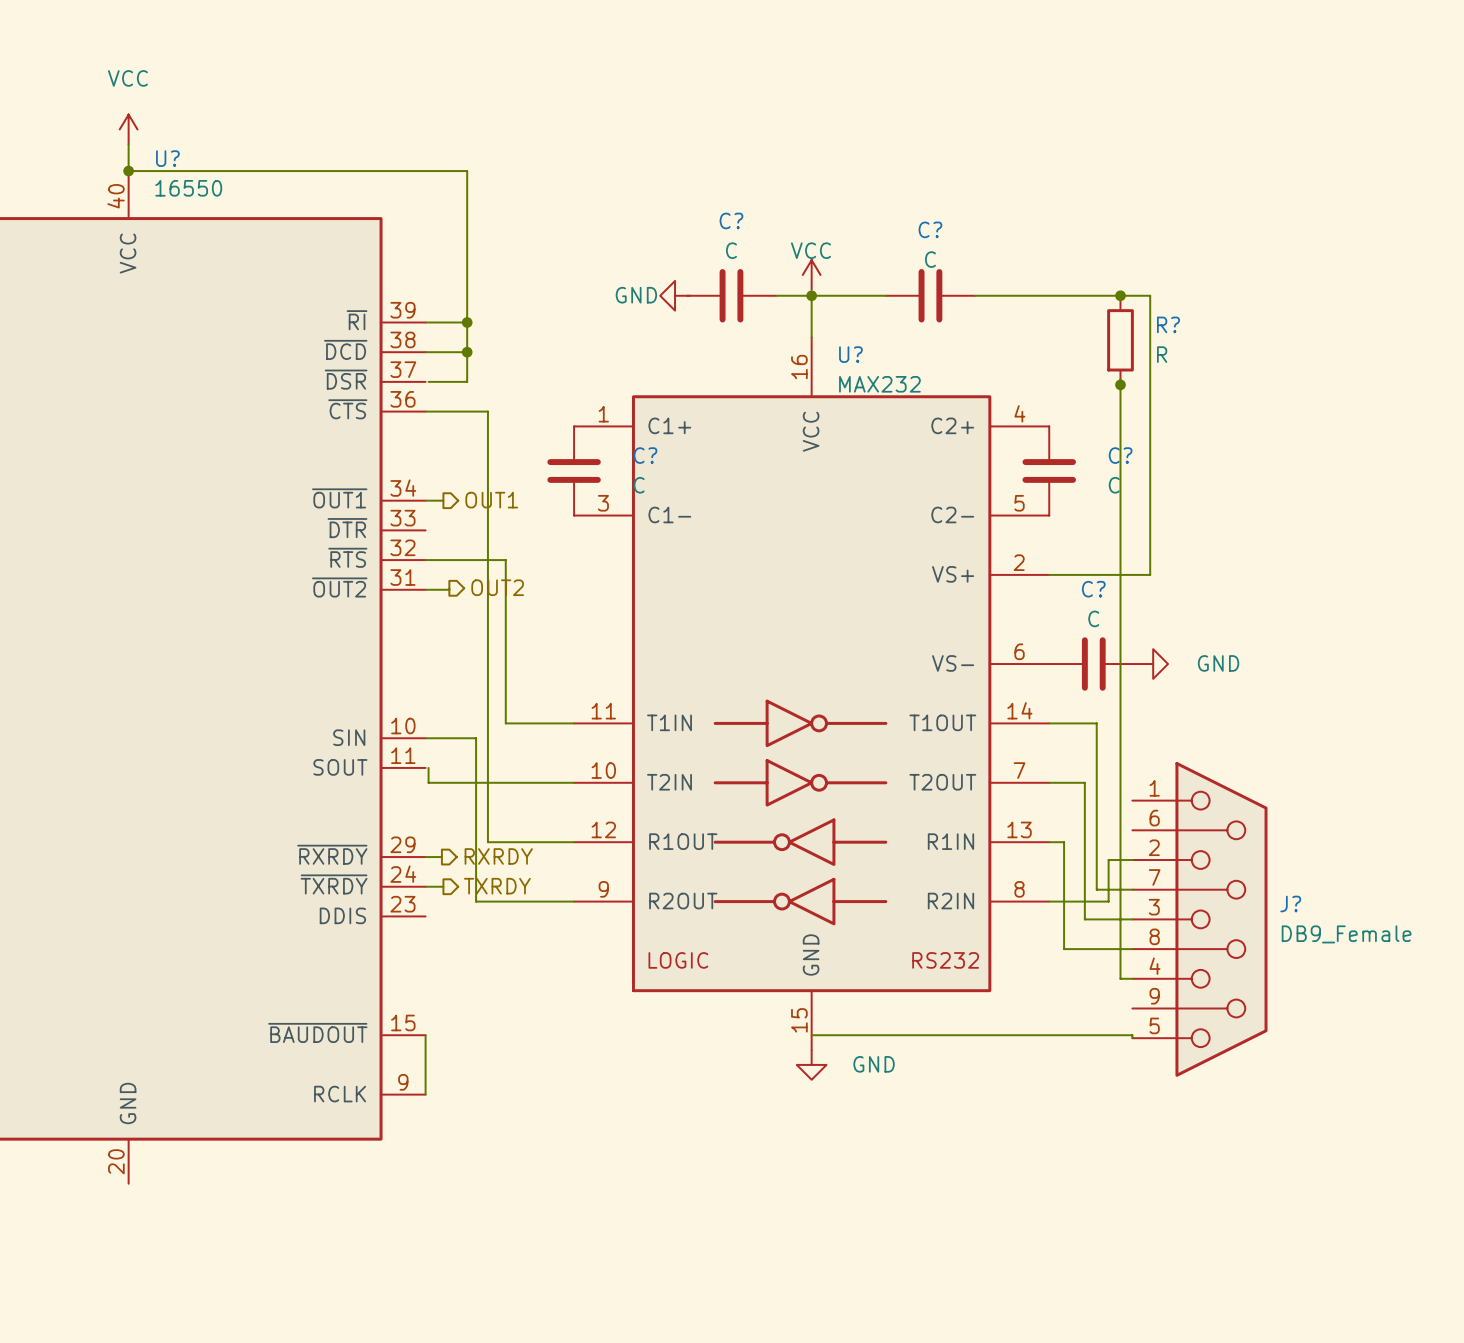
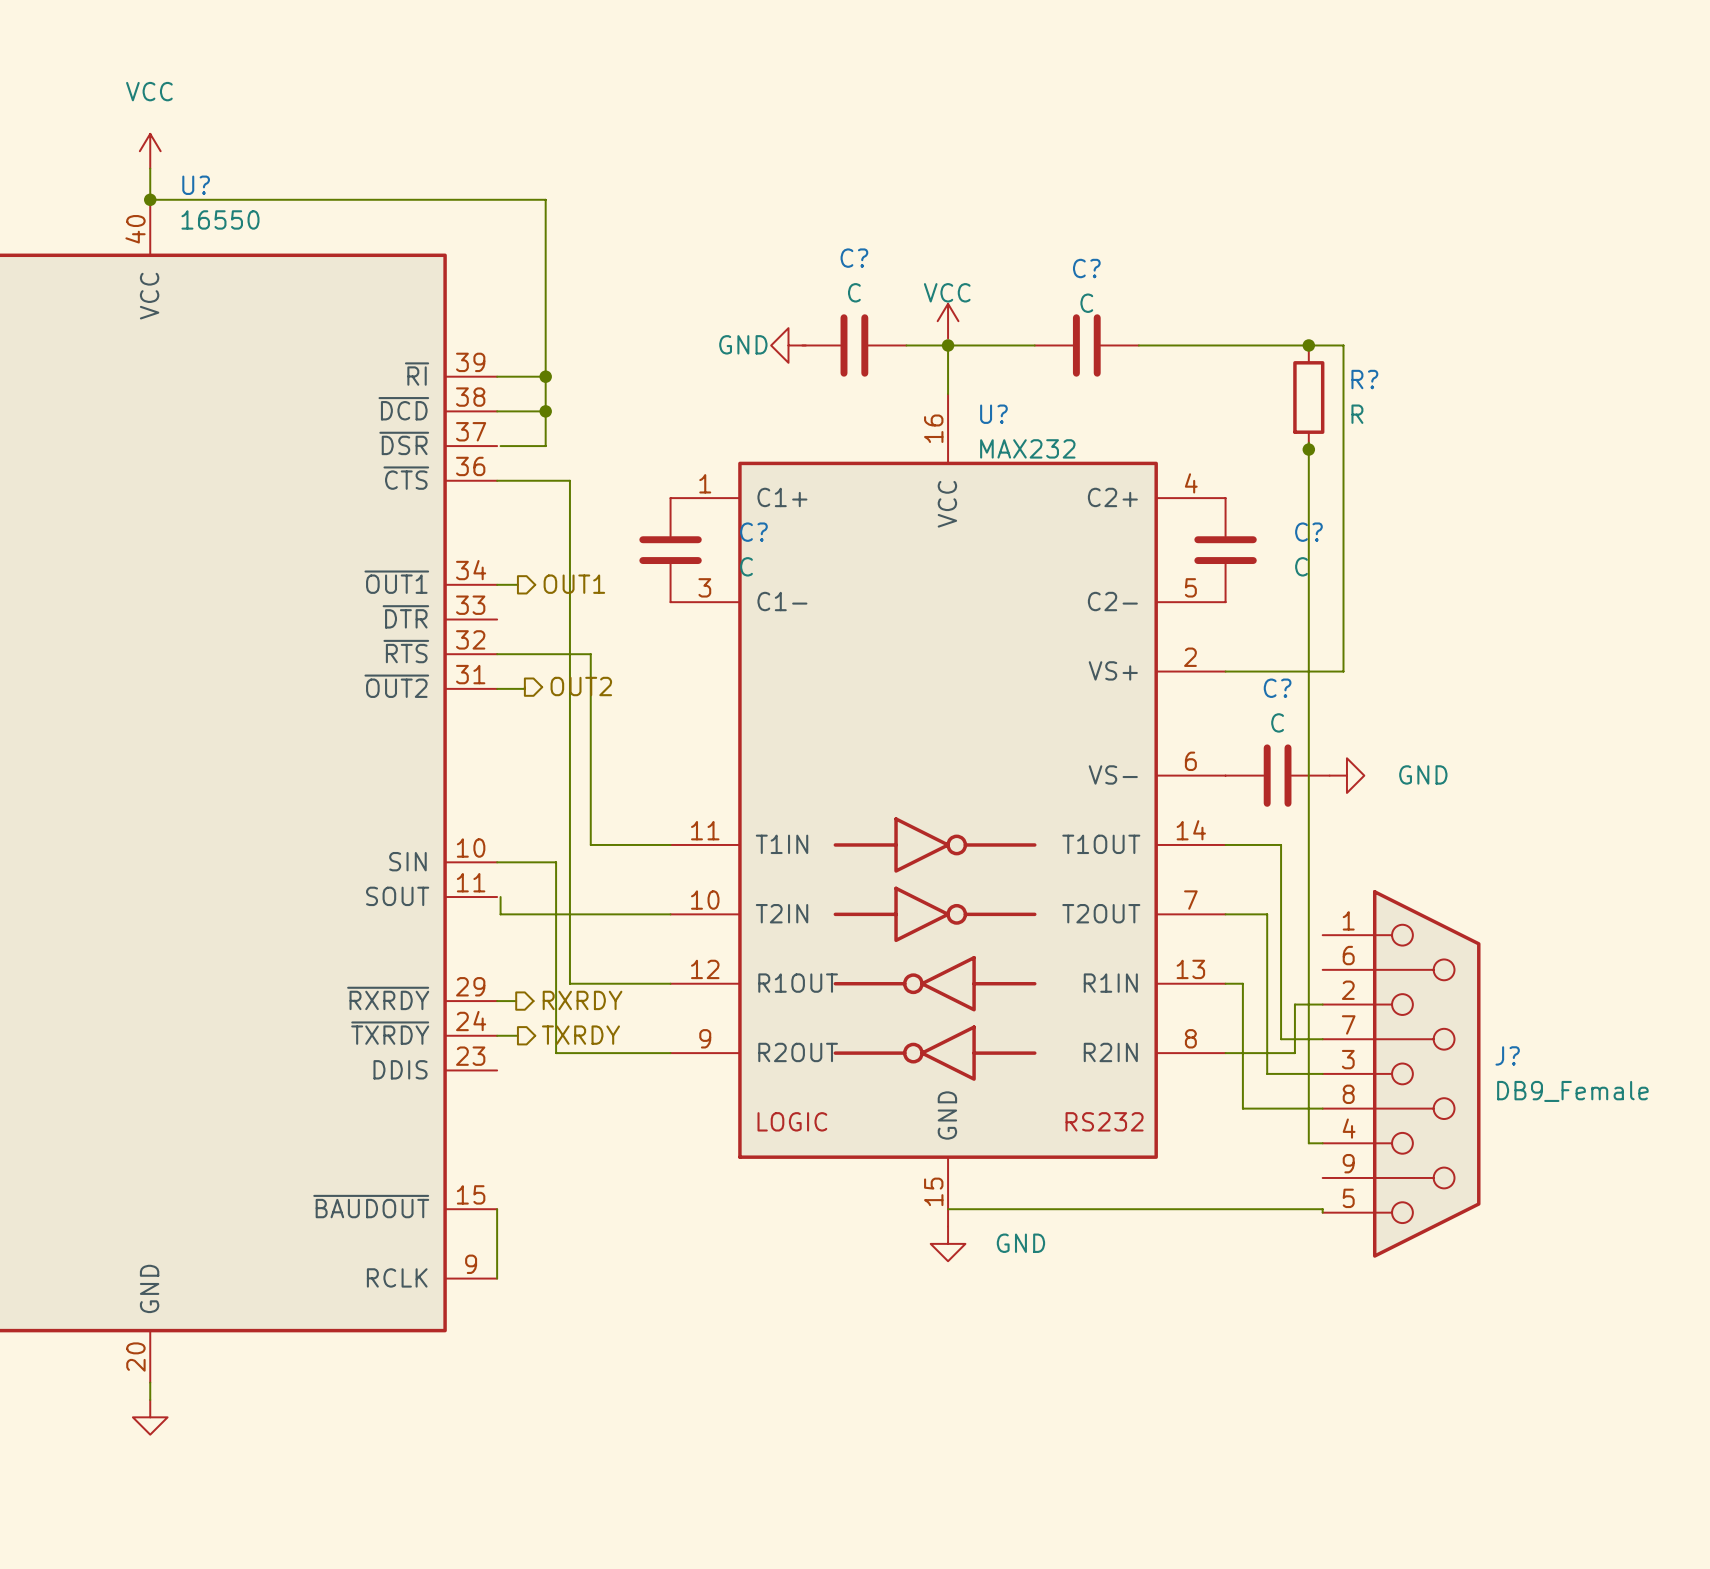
wire: none -> (150, 1382) (150, 1399)
power symbol: none -> (150, 1417)

